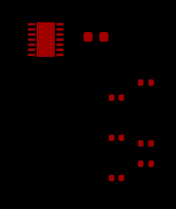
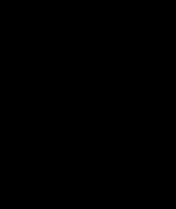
part: (95, 36) -> none
part: (45, 39) -> none
part: (145, 82) -> none
part: (116, 97) -> none
part: (116, 137) -> none
part: (145, 143) -> none
part: (145, 163) -> none
part: (116, 177) -> none

